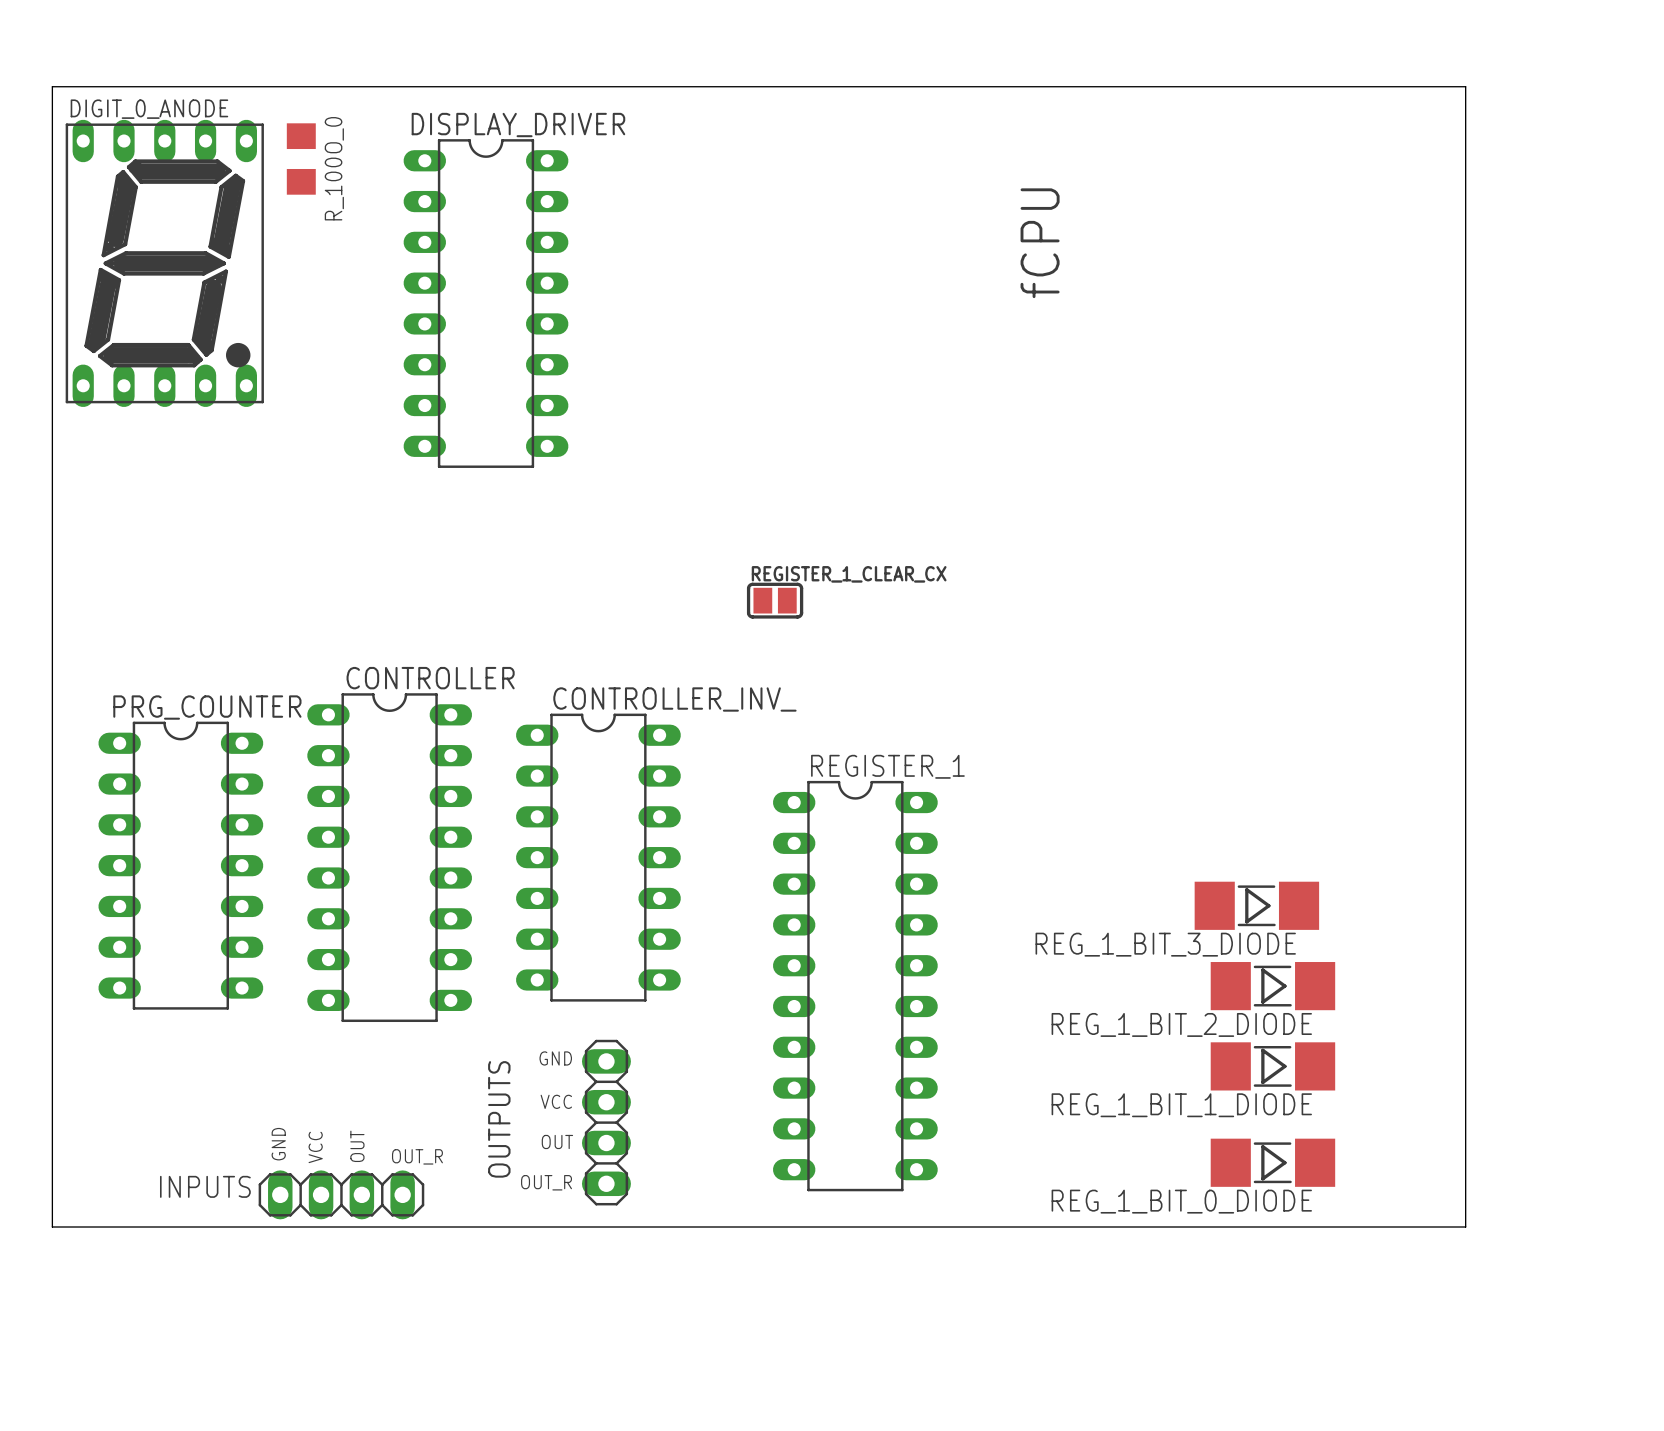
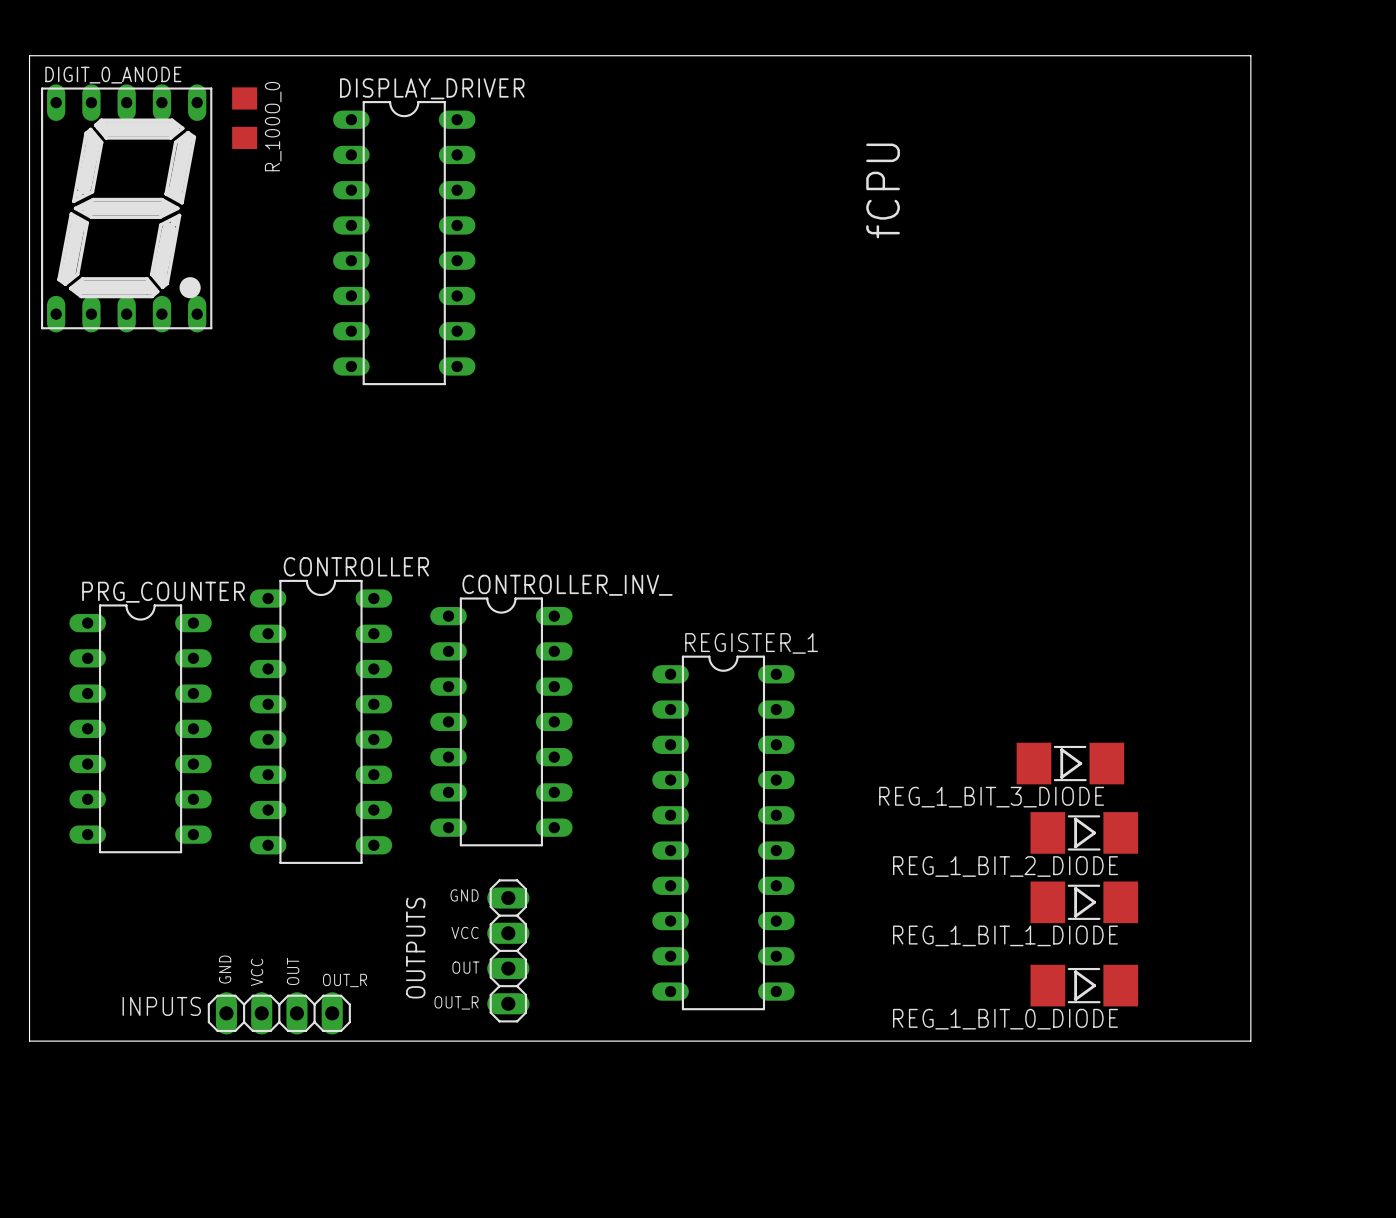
REGISTER_1_CLEAR_CX: (775, 600) -> none

